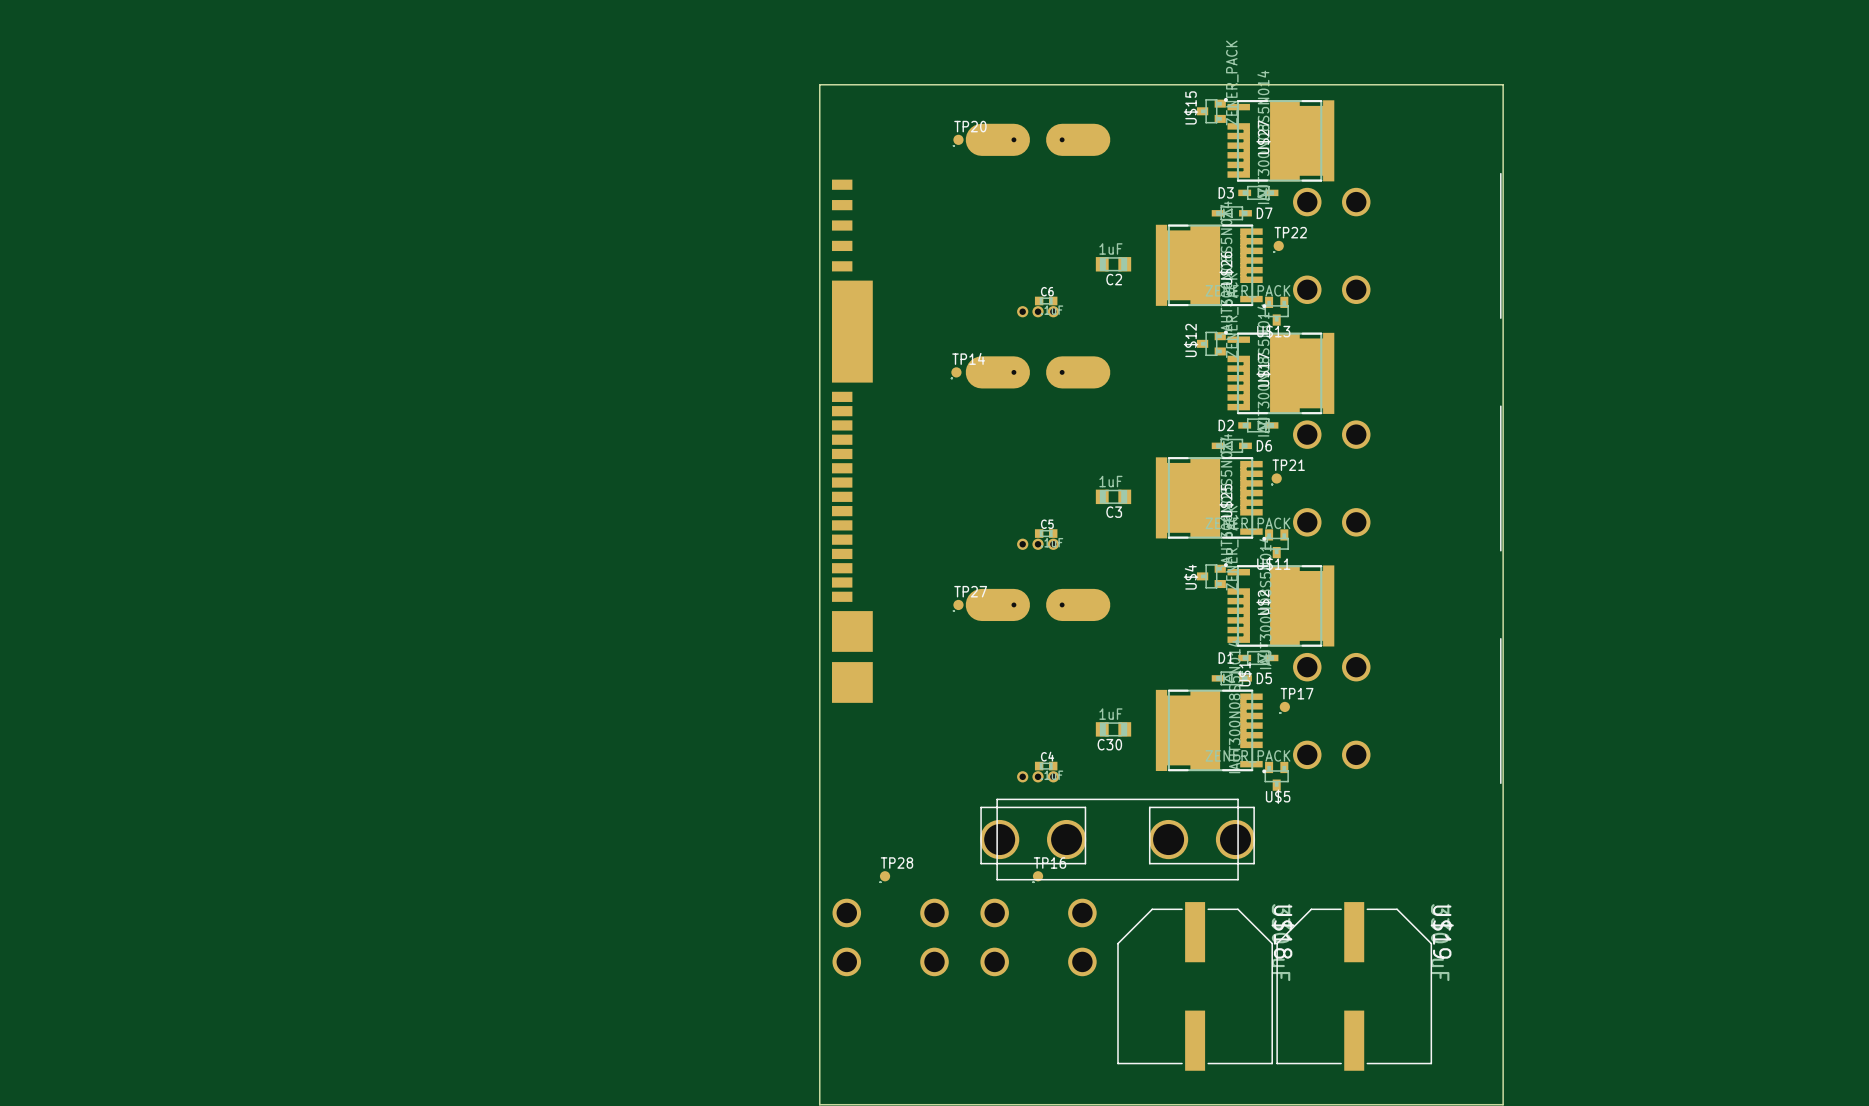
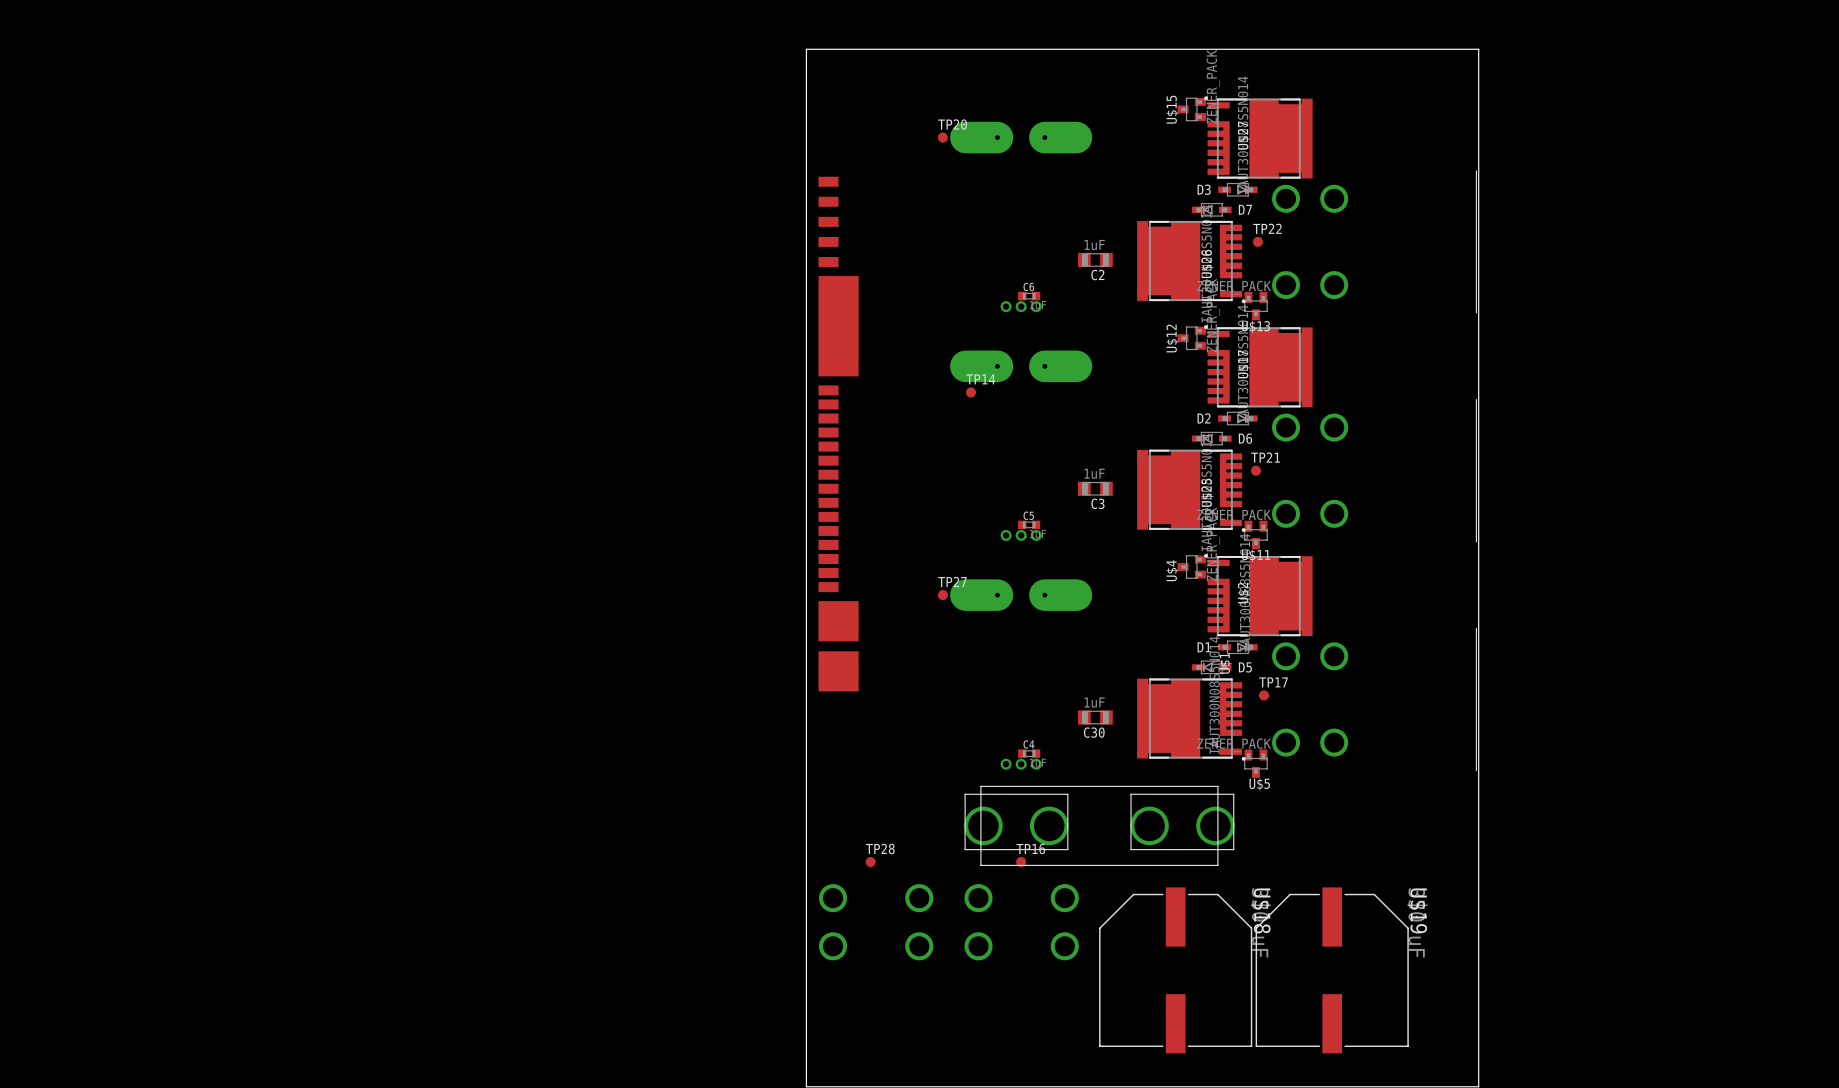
board edge: (819, 84) (1503, 84) -> (806, 83) (806, 49) (1478, 49) (1478, 83)
TP14 position: (956, 372) -> (970, 392)

